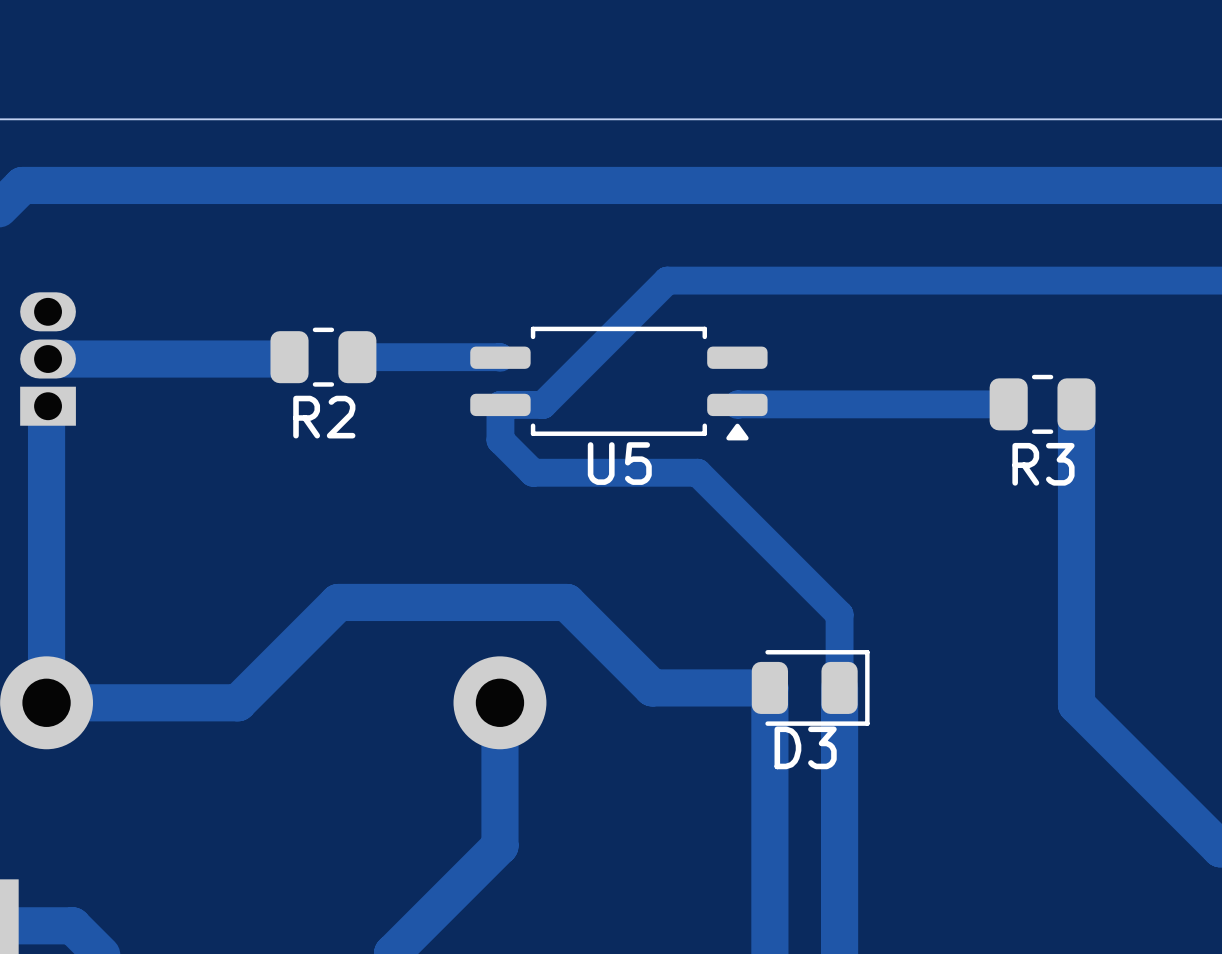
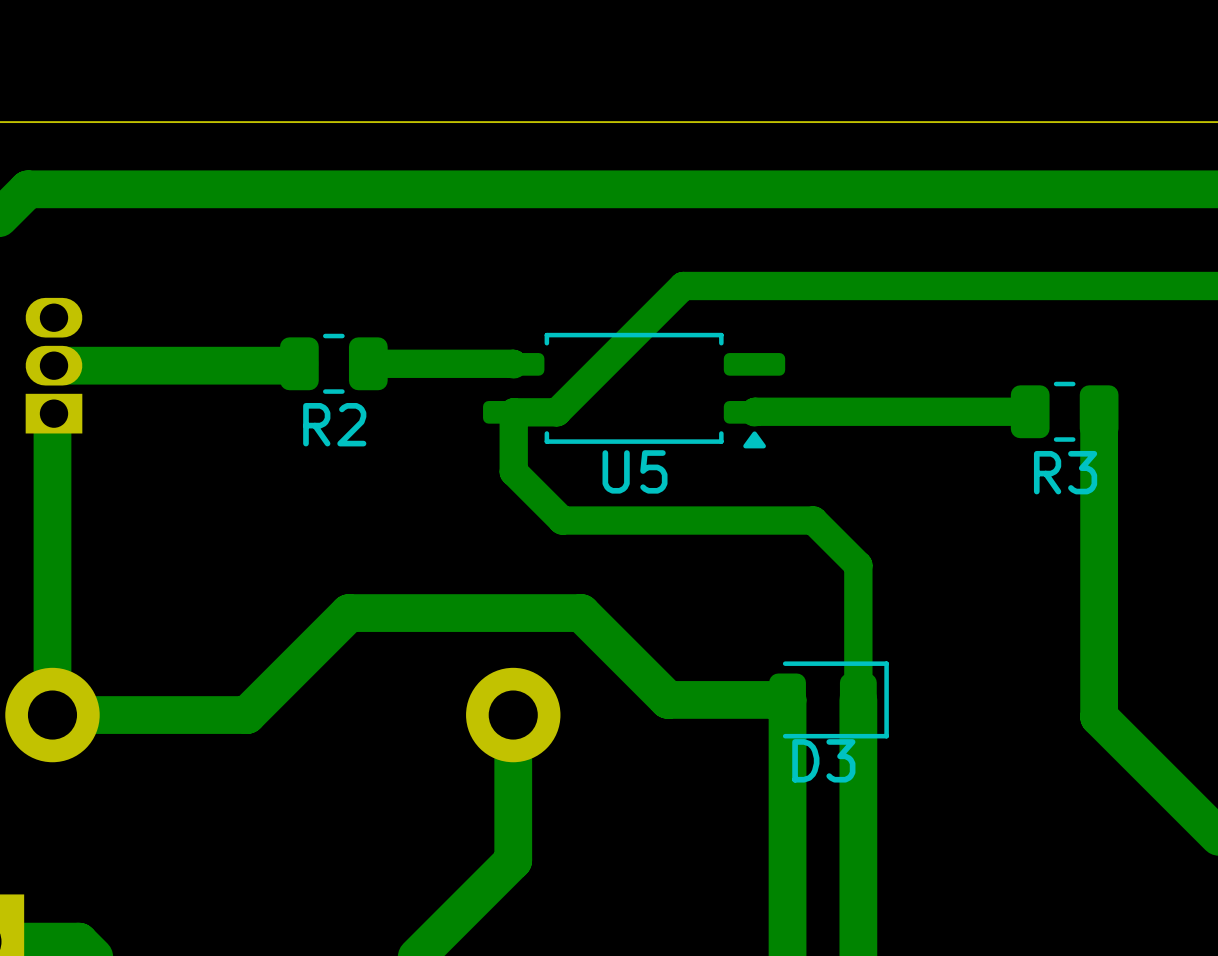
track: (500, 440) (533, 472) (697, 472) (839, 614) -> (513, 448) (513, 471) (562, 520) (813, 520) (858, 565) (858, 625)

